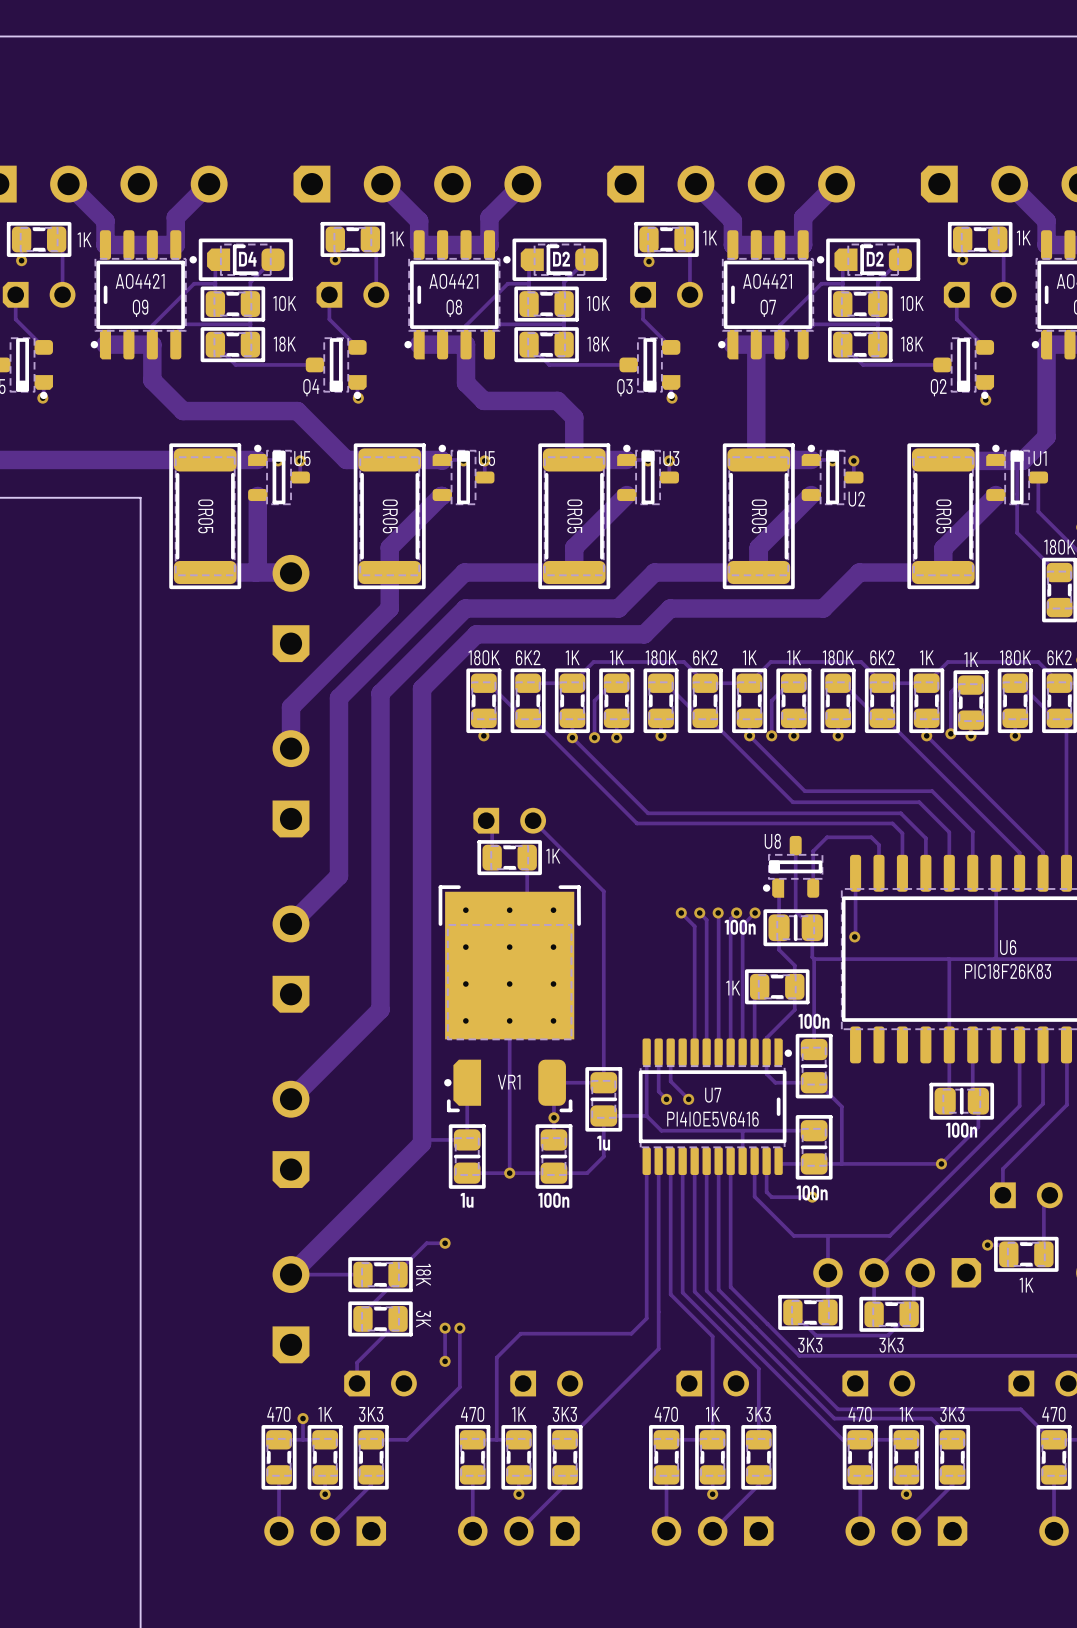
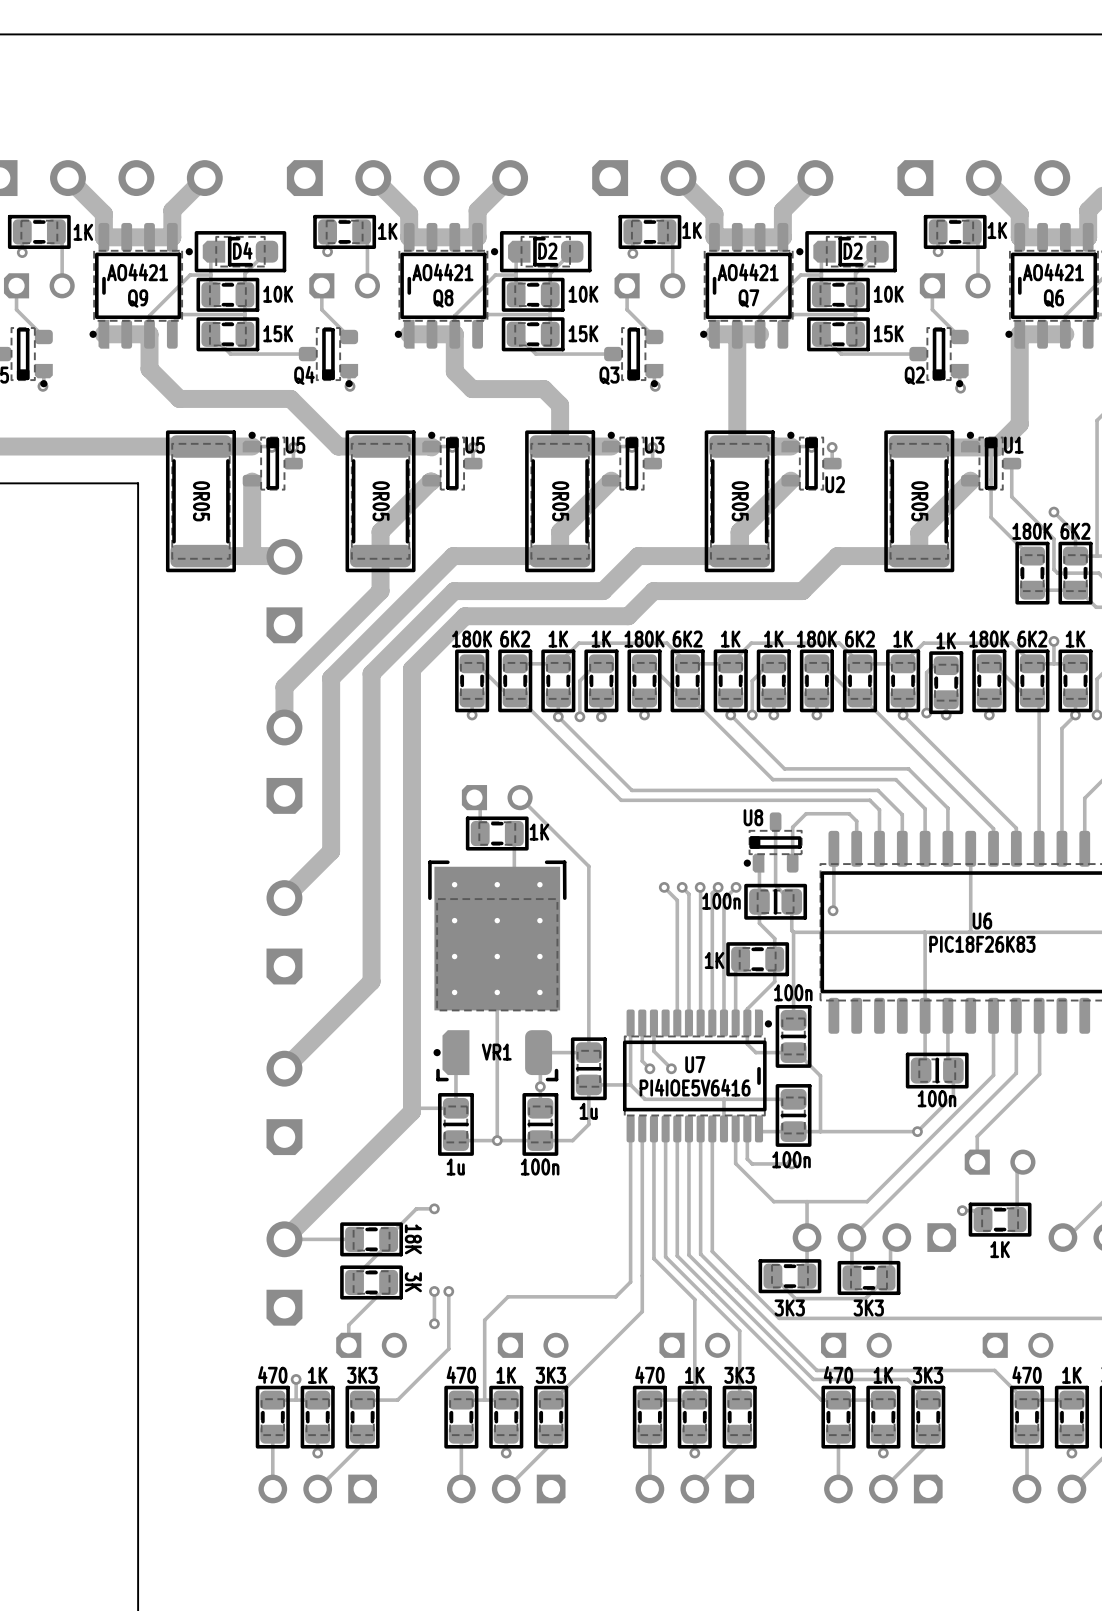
part value: 18K (284, 344) -> 15K (278, 333)
part value: 18K (598, 344) -> 15K (583, 333)
part value: 18K (912, 344) -> 15K (888, 333)

